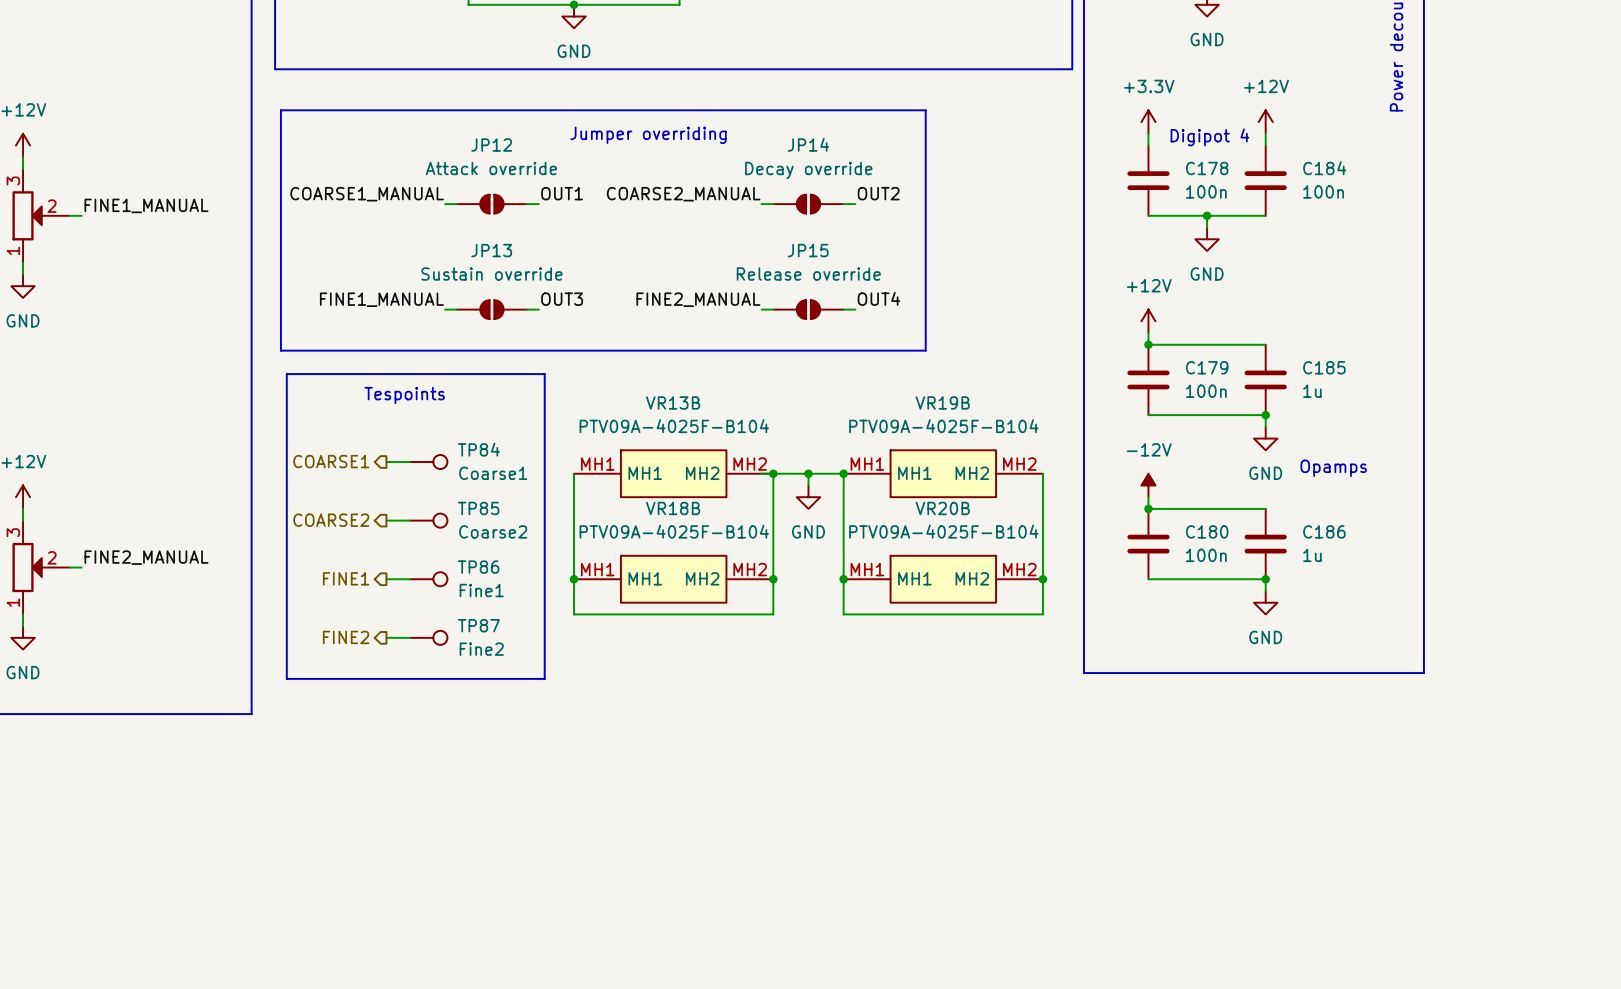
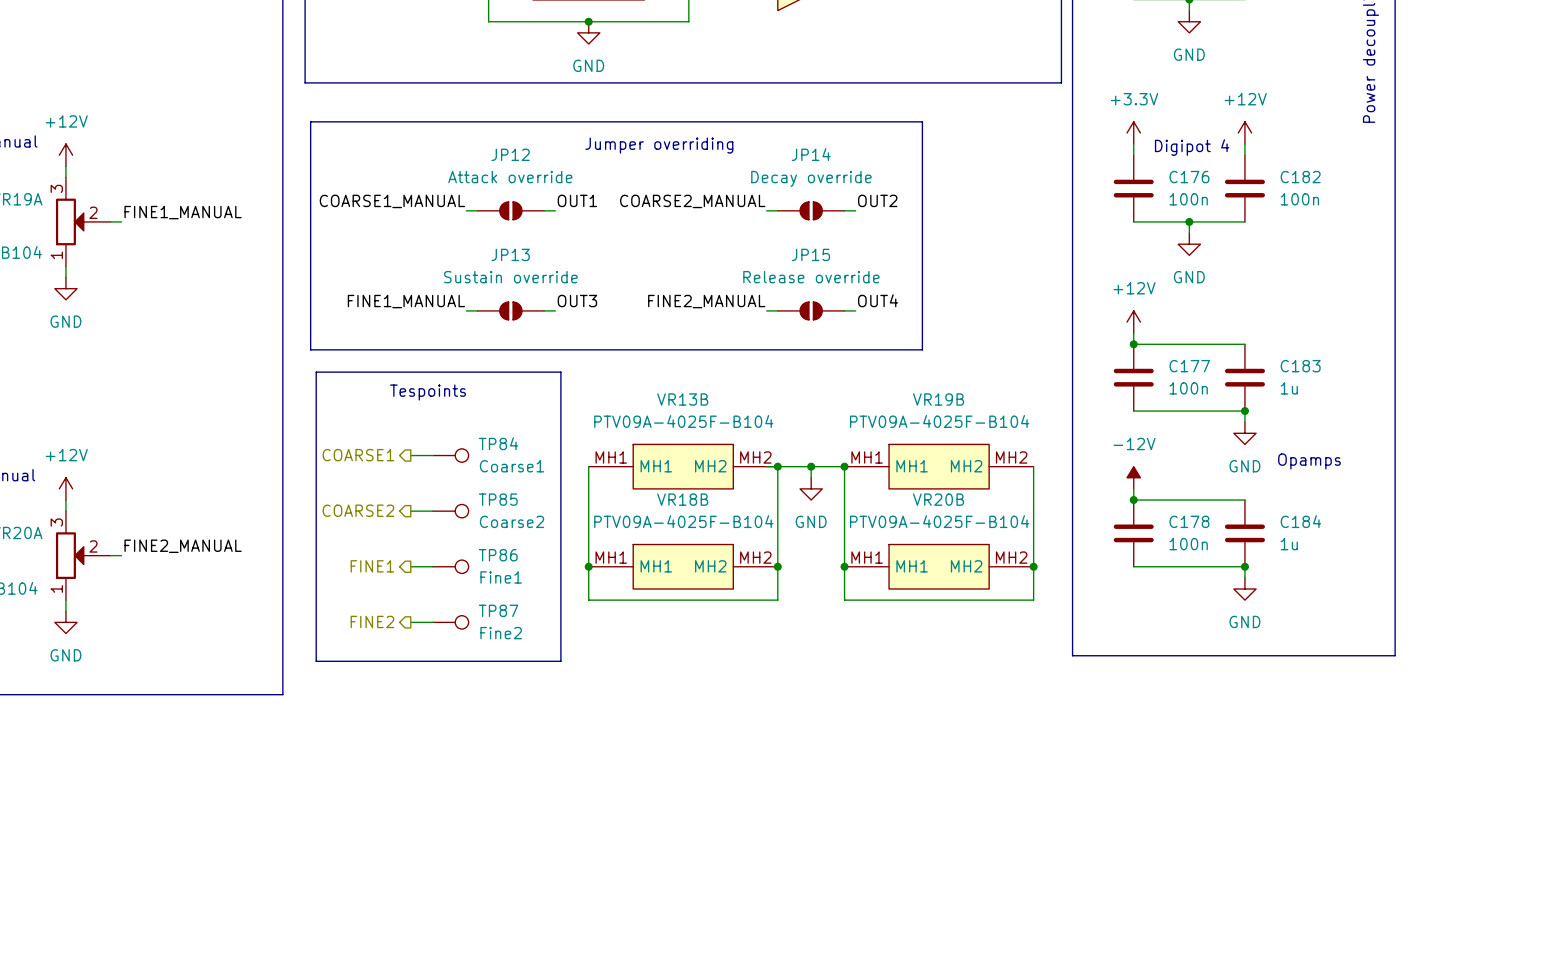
C178 name: C178 (1207, 168) -> C176 (1189, 177)
C184 name: C184 (1324, 168) -> C182 (1300, 177)
C179 name: C179 (1207, 367) -> C177 (1189, 366)
C185 name: C185 (1324, 367) -> C183 (1300, 366)
C180 name: C180 (1207, 531) -> C178 (1189, 521)
C186 name: C186 (1324, 531) -> C184 (1300, 521)

